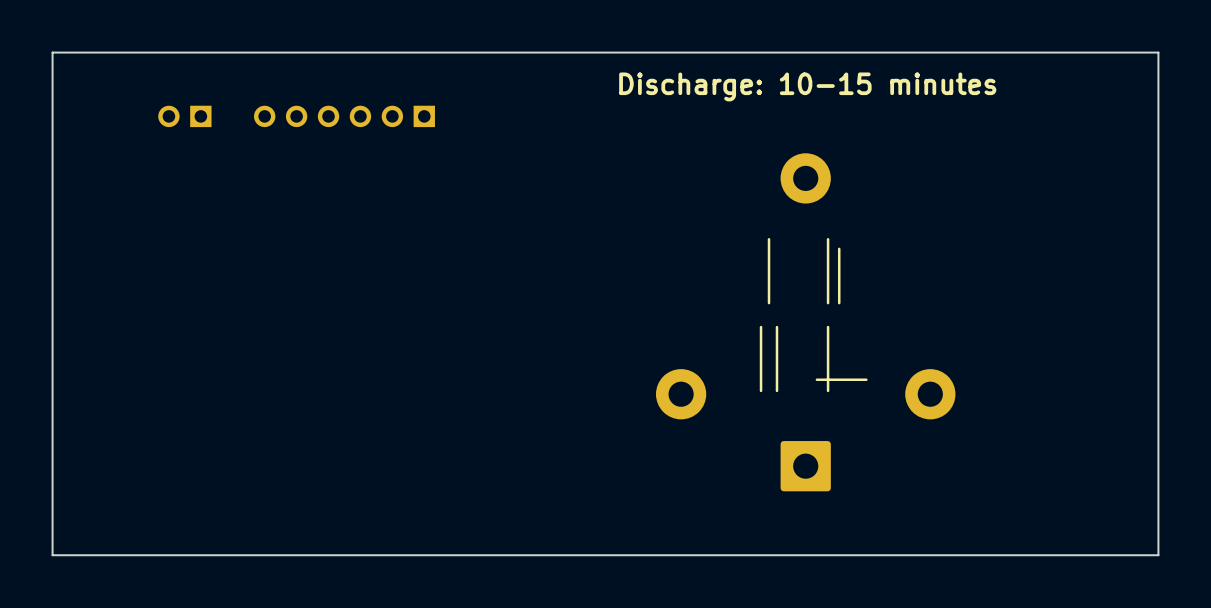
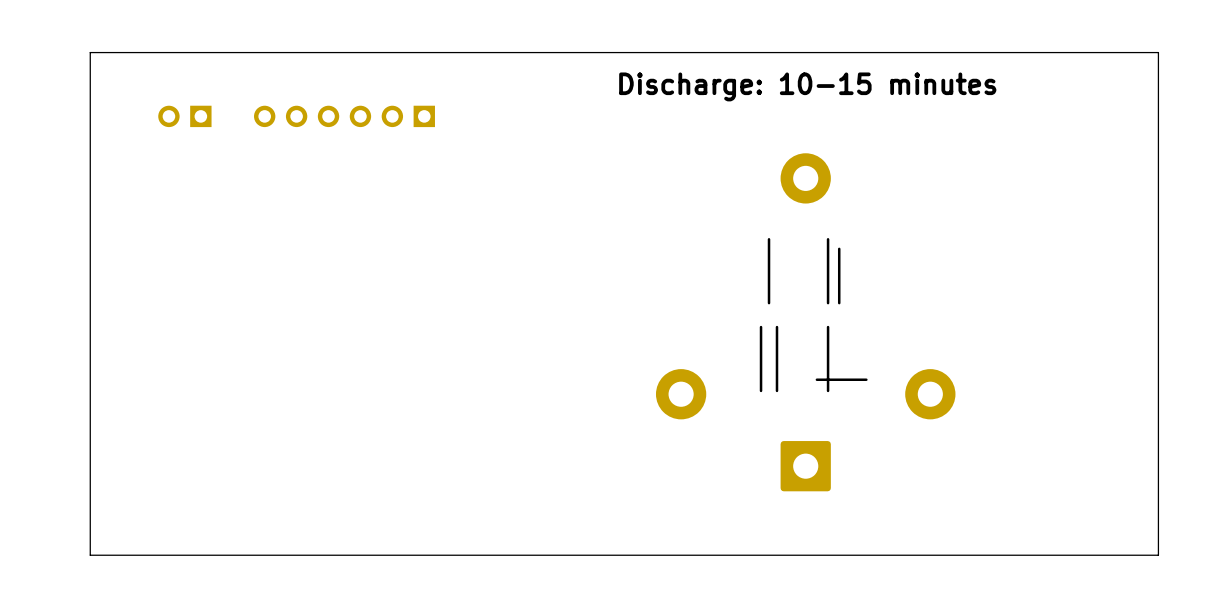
board edge: (90, 52) (52, 52) (52, 555) (90, 555) -> (90, 52) (90, 555)

